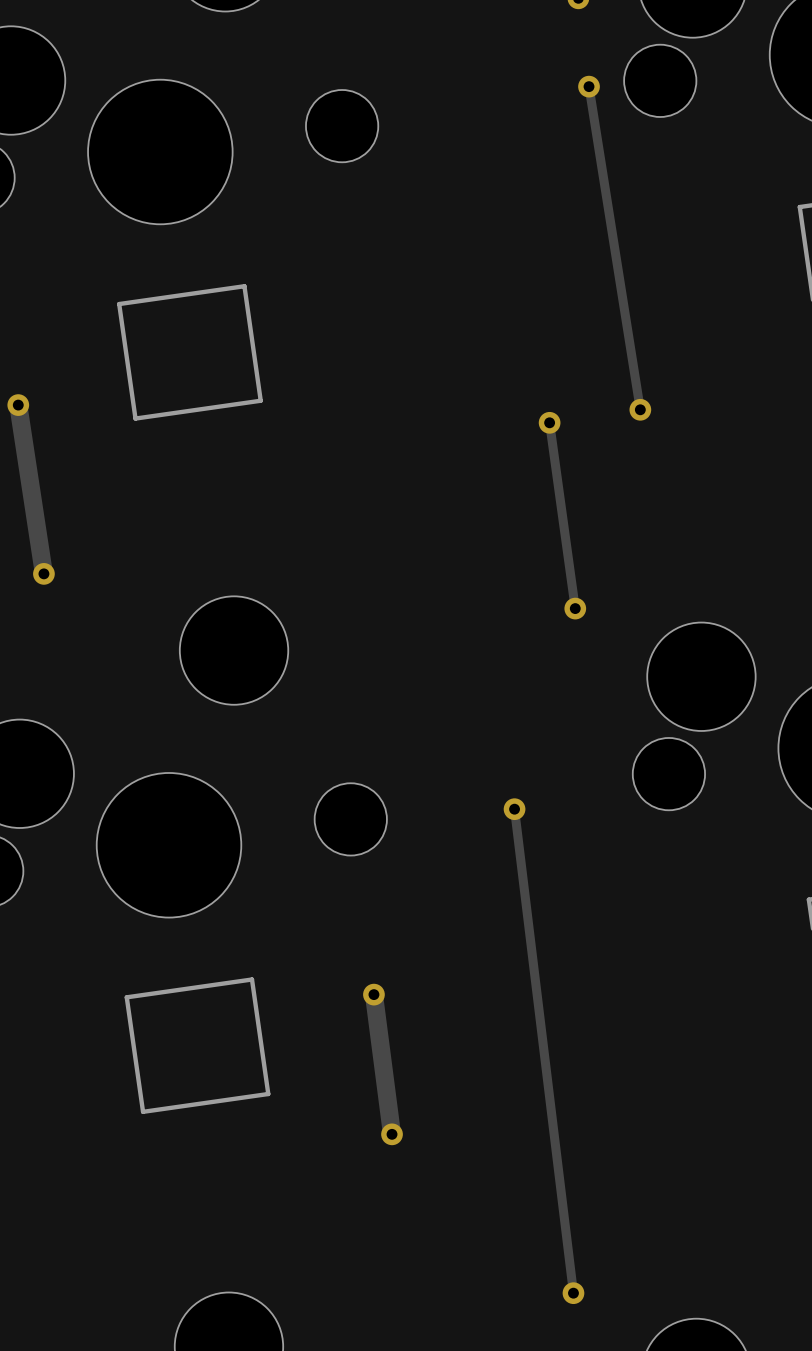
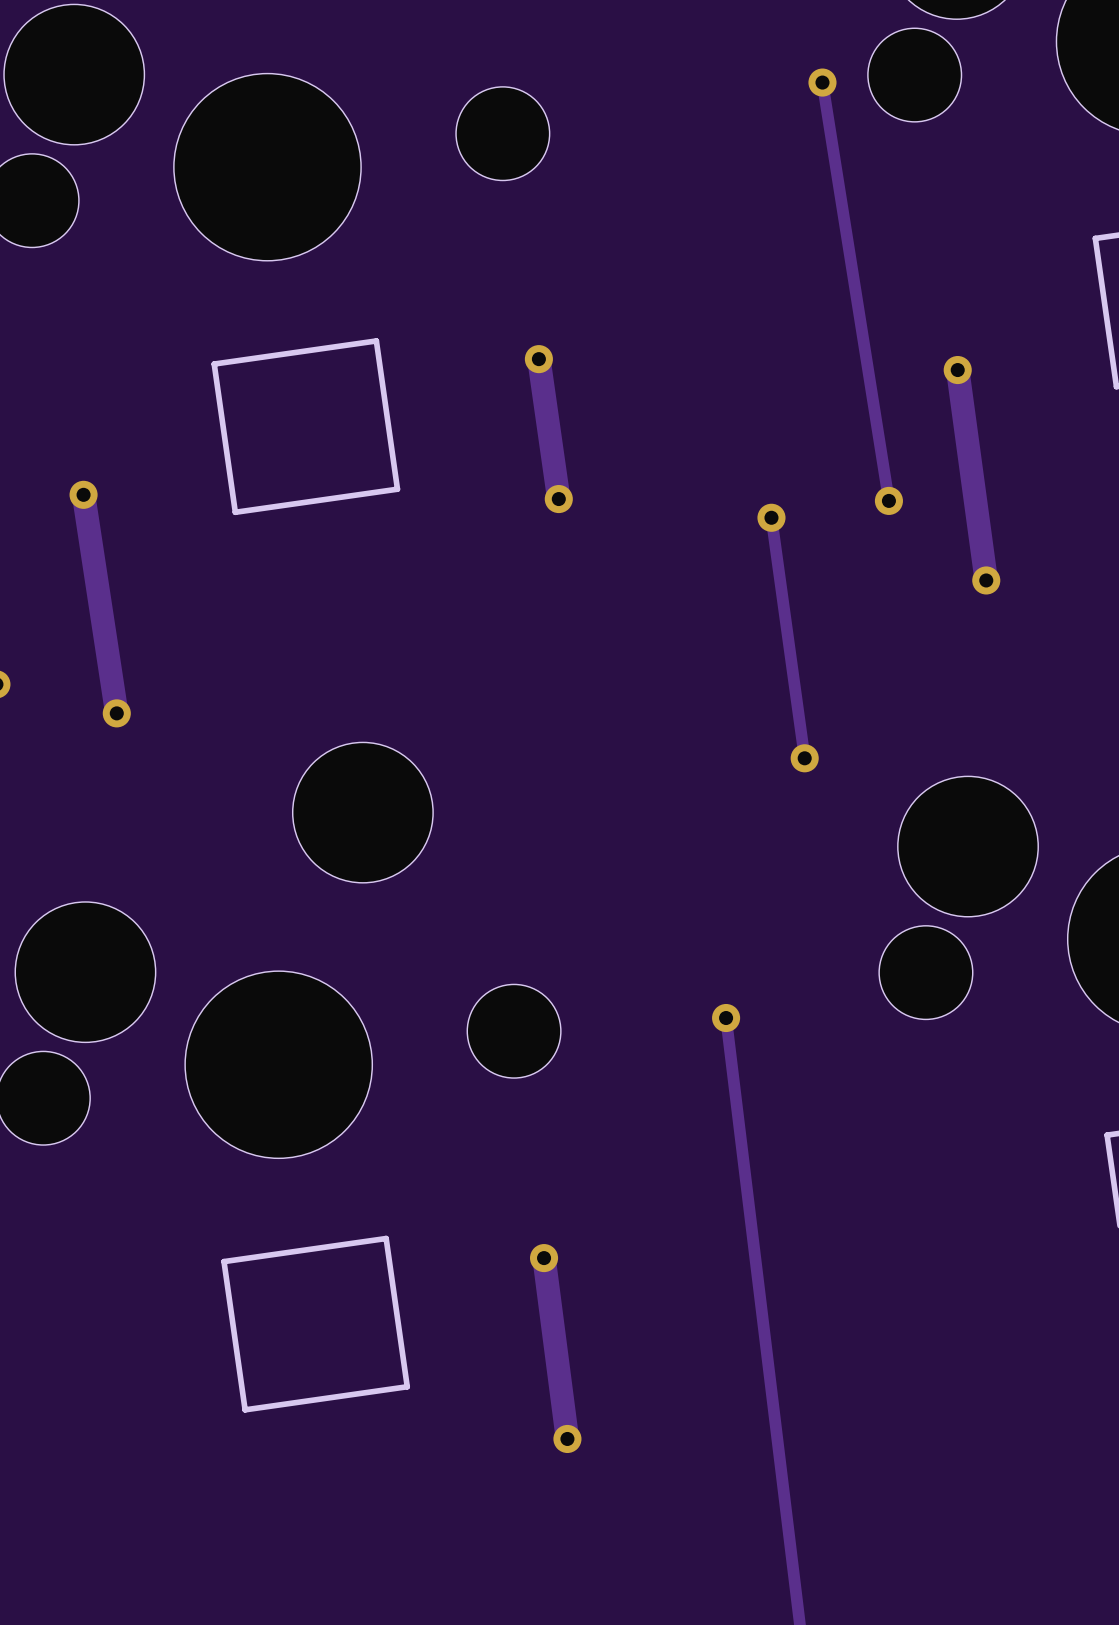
track: none -> (538, 359) (558, 499)
via: none -> (538, 359)
track: none -> (957, 370) (986, 580)
via: none -> (957, 370)
via: none -> (558, 499)
via: none -> (986, 580)

